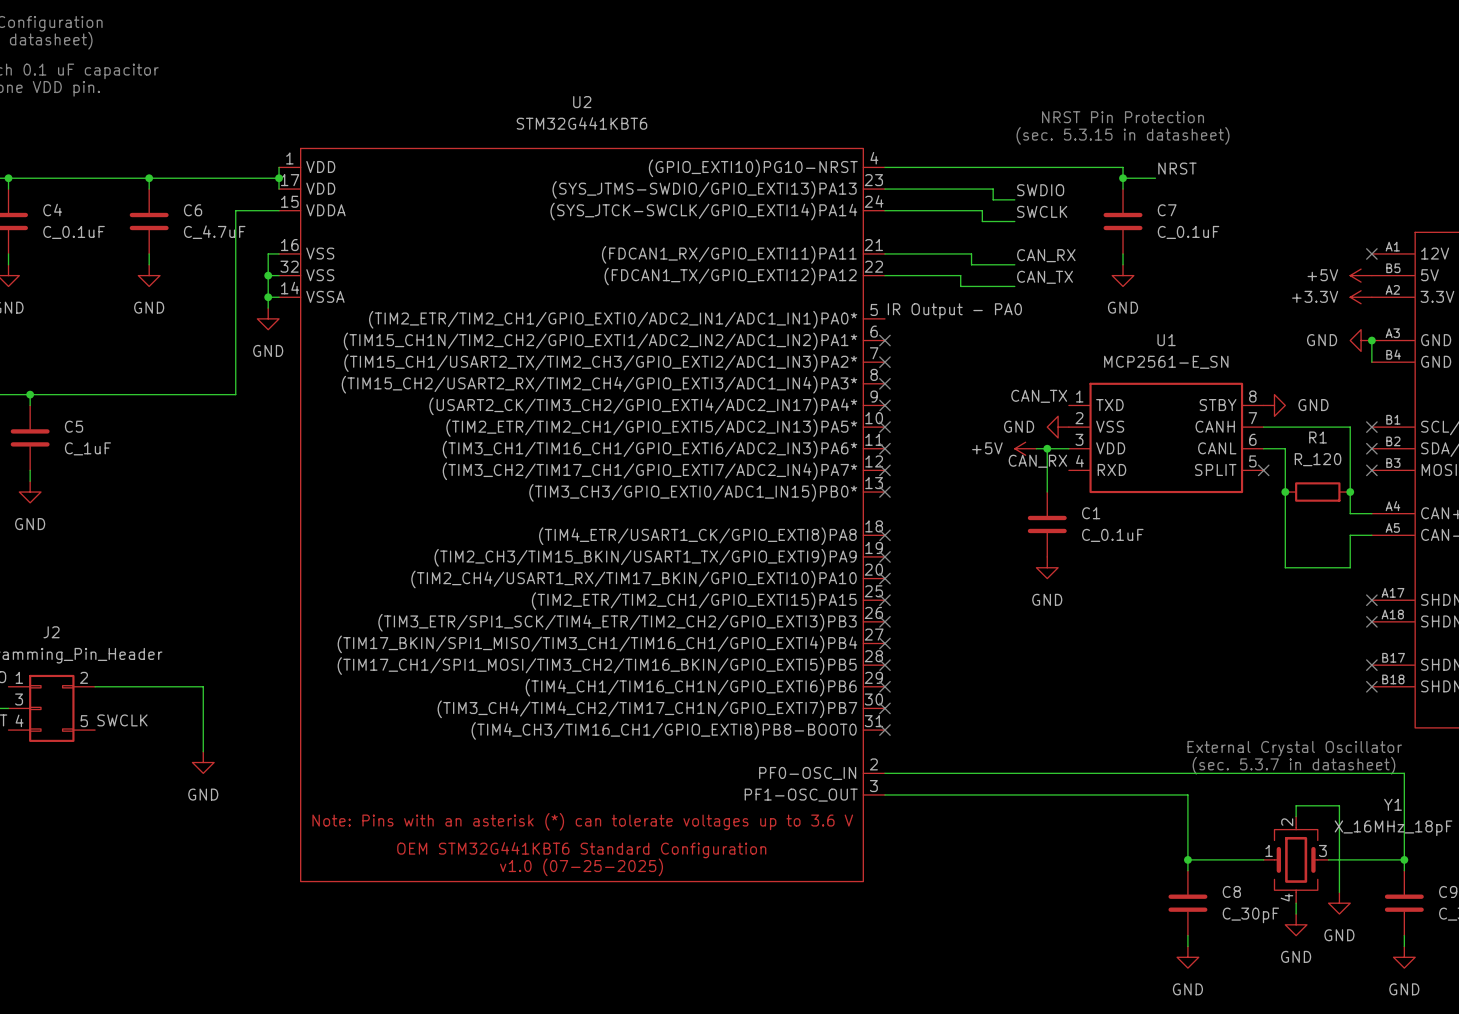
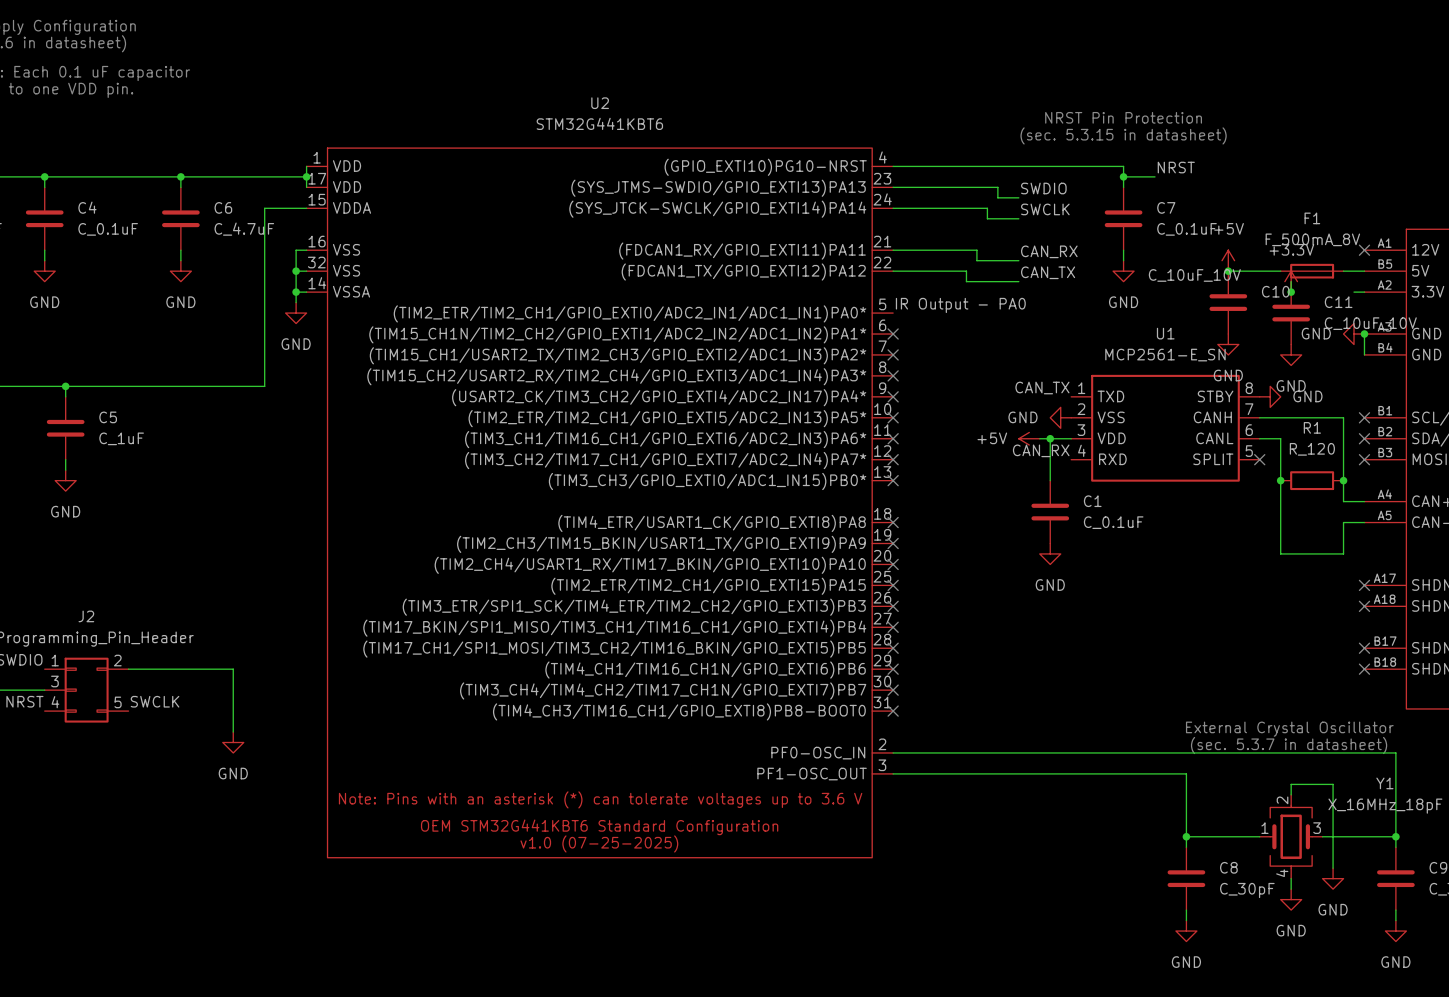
wire: none -> (1228, 271) (1280, 271)
junction: none -> (1228, 271)
F1: none -> F_500mA_8V (1312, 271)
power symbol rotation: 0° (1361, 275) -> 90° clockwise (1228, 260)
power symbol position: +5V (1361, 275) -> +5V (1228, 260)
wire: none -> (1291, 281) (1291, 292)
power symbol text position: +3.3V (1315, 296) -> +3.3V (1291, 249)
junction: none -> (1291, 292)
power symbol rotation: 0° (1361, 297) -> 90° clockwise (1291, 281)
power symbol position: +3.3V (1361, 297) -> +3.3V (1291, 281)
C10: none -> C_10uF_10V (1228, 302)
C11: none -> C_10uF_10V (1291, 313)
power symbol: none -> GND (1228, 344)
power symbol: none -> GND (1291, 354)

